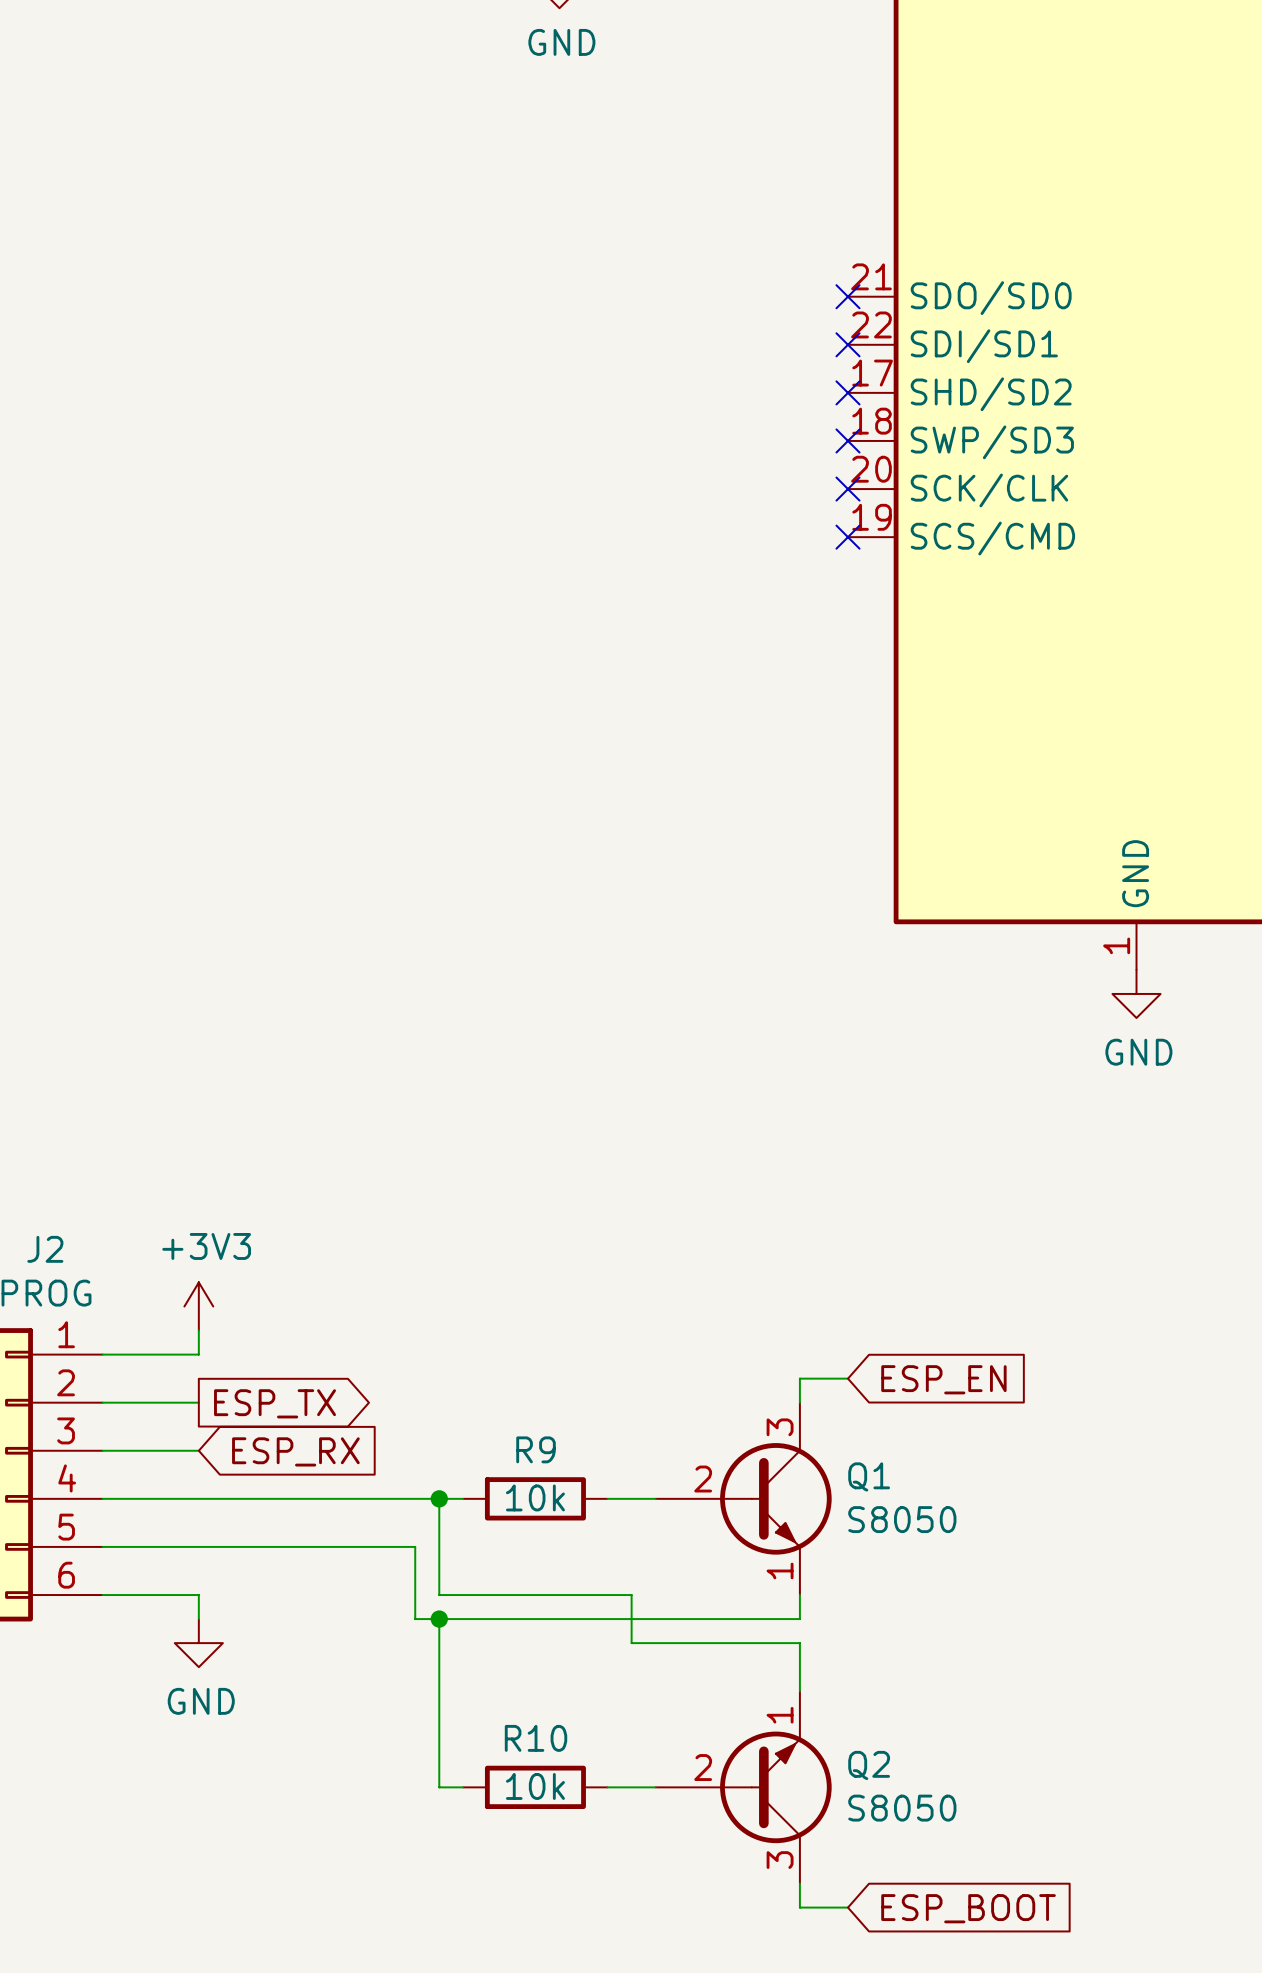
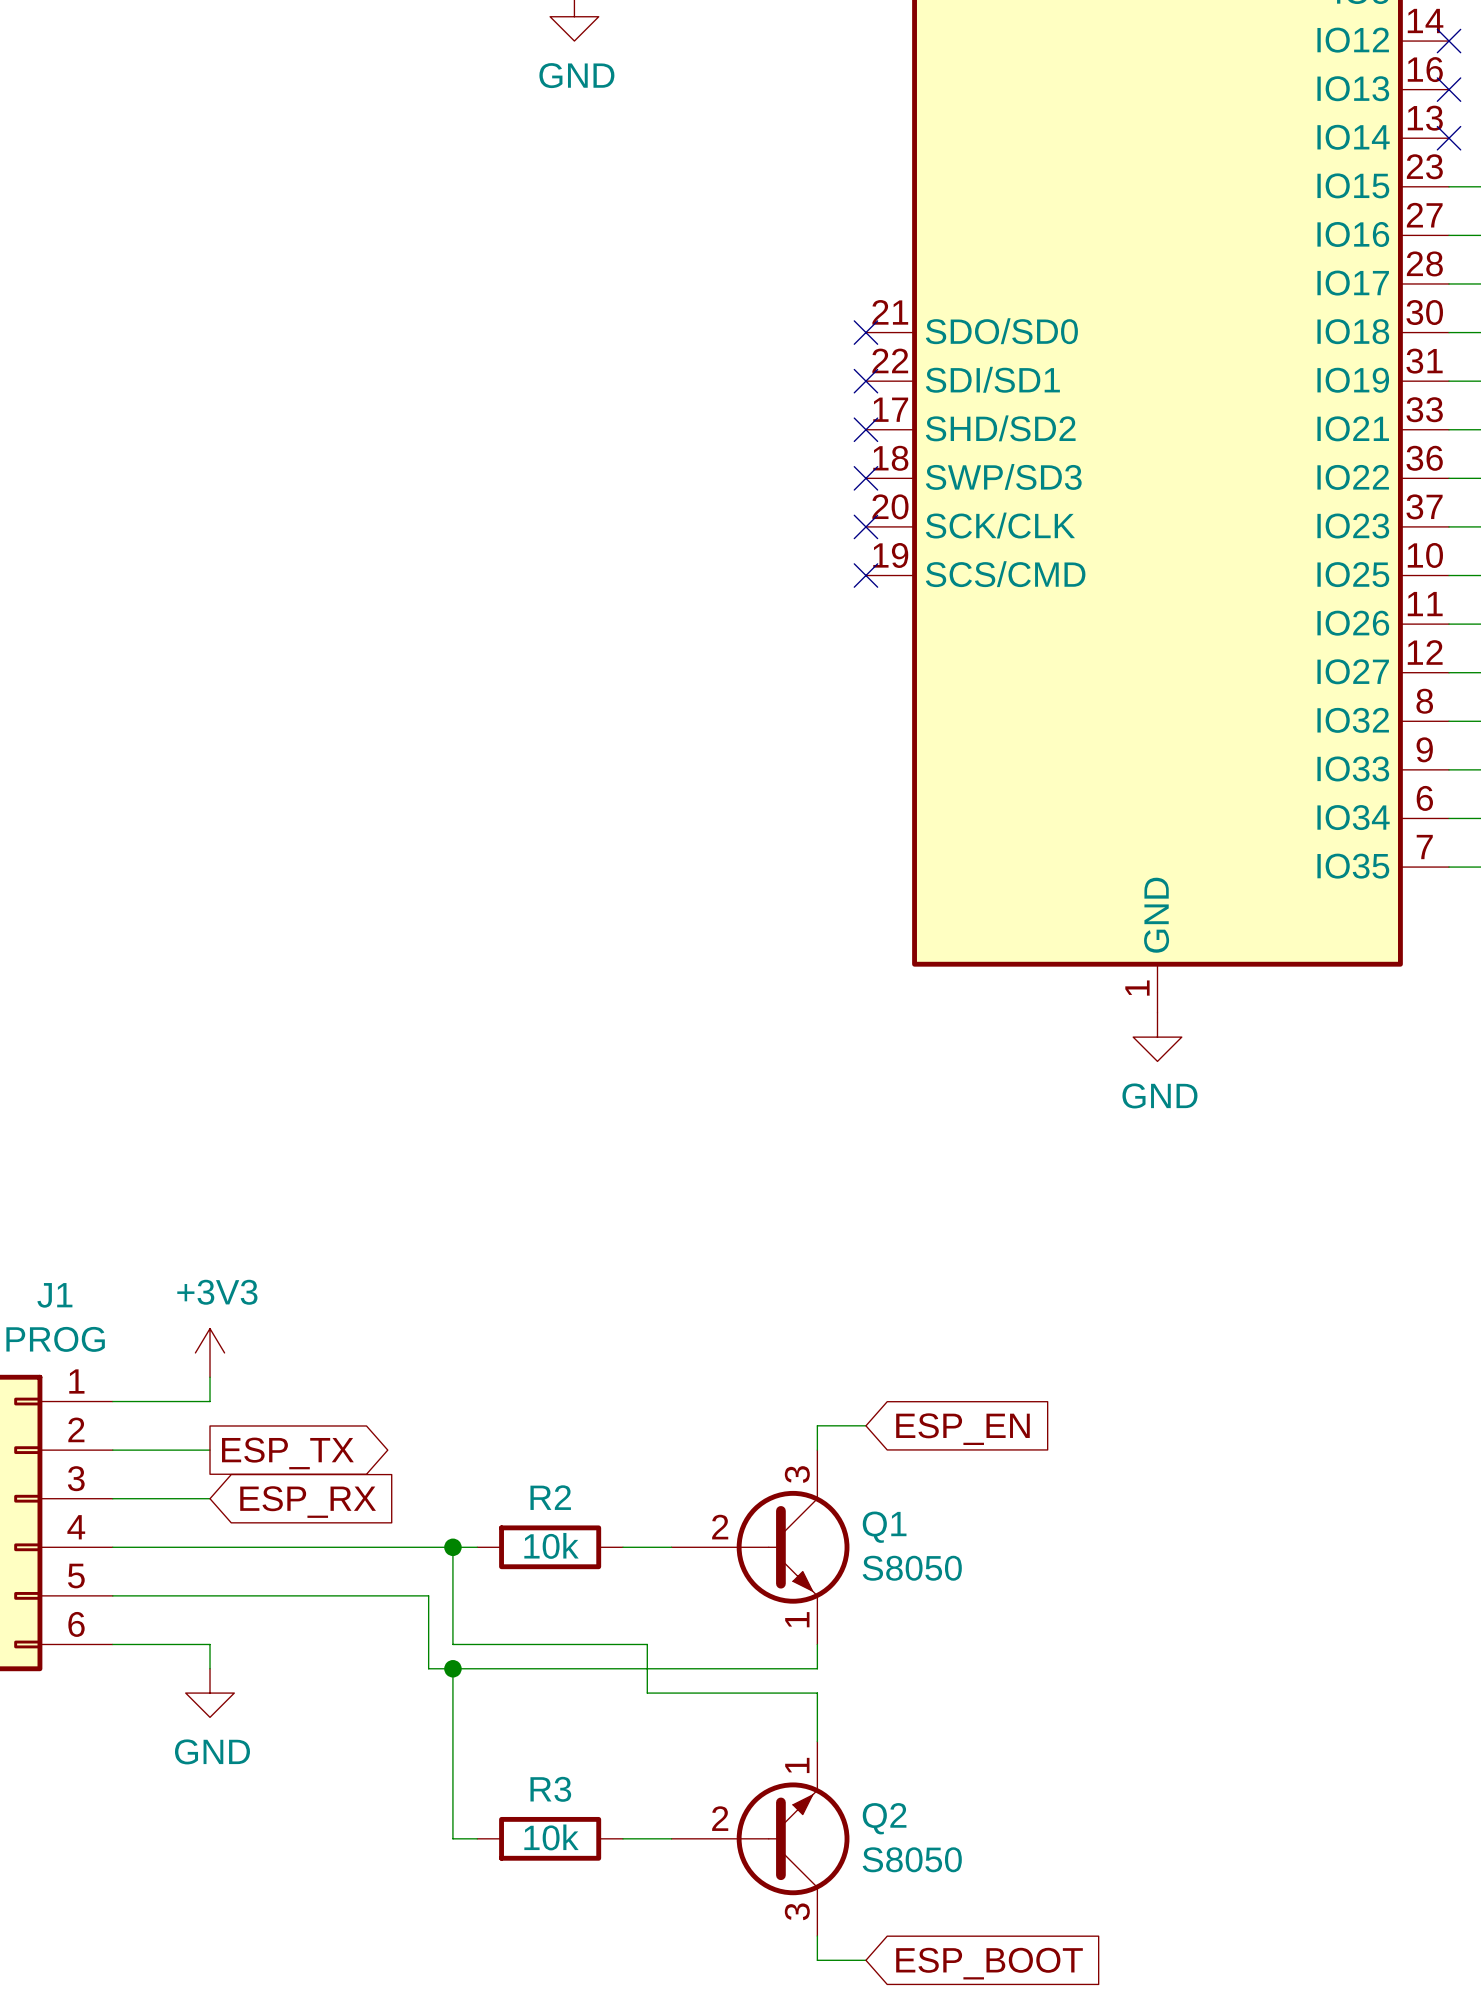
J2 name: J2 (45, 1249) -> J1 (54, 1295)
R9 name: R9 (536, 1449) -> R2 (550, 1497)
R10 name: R10 (536, 1738) -> R3 (550, 1789)

